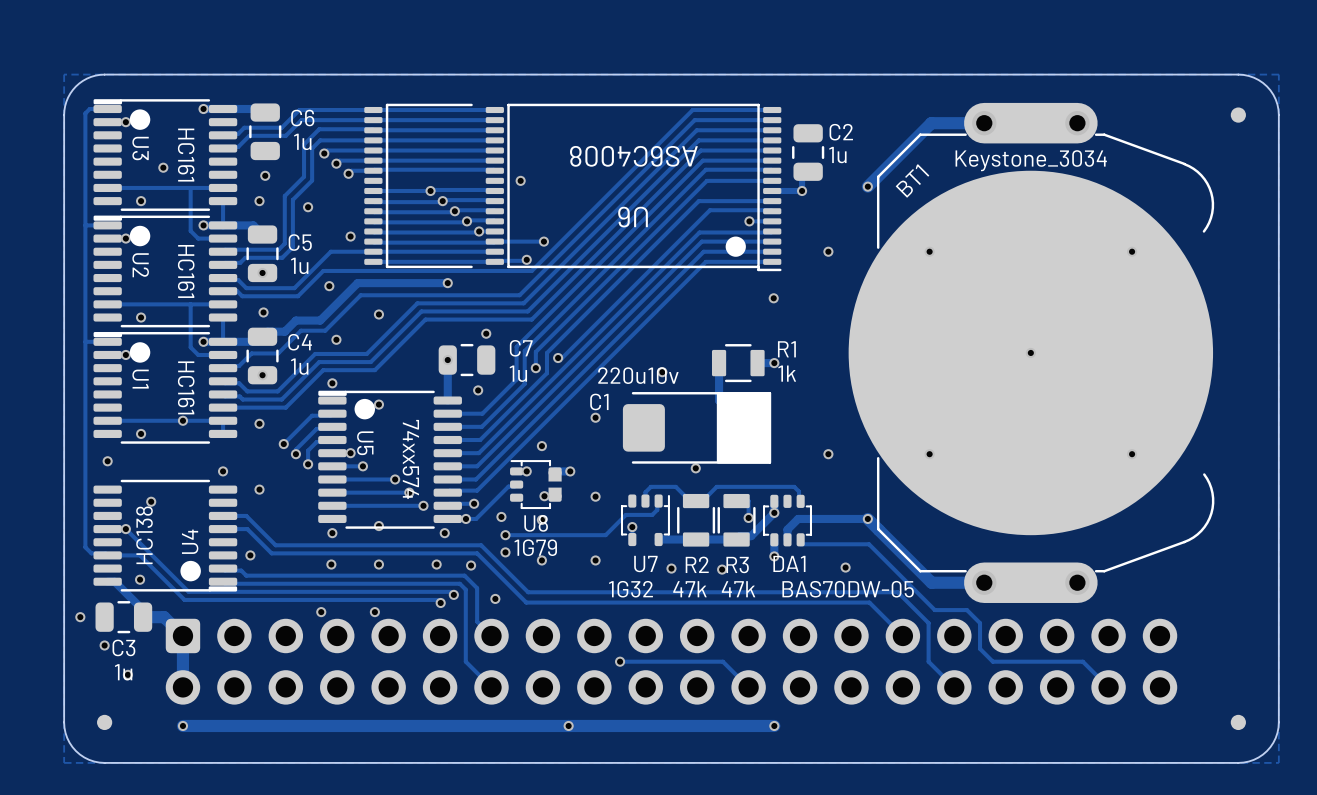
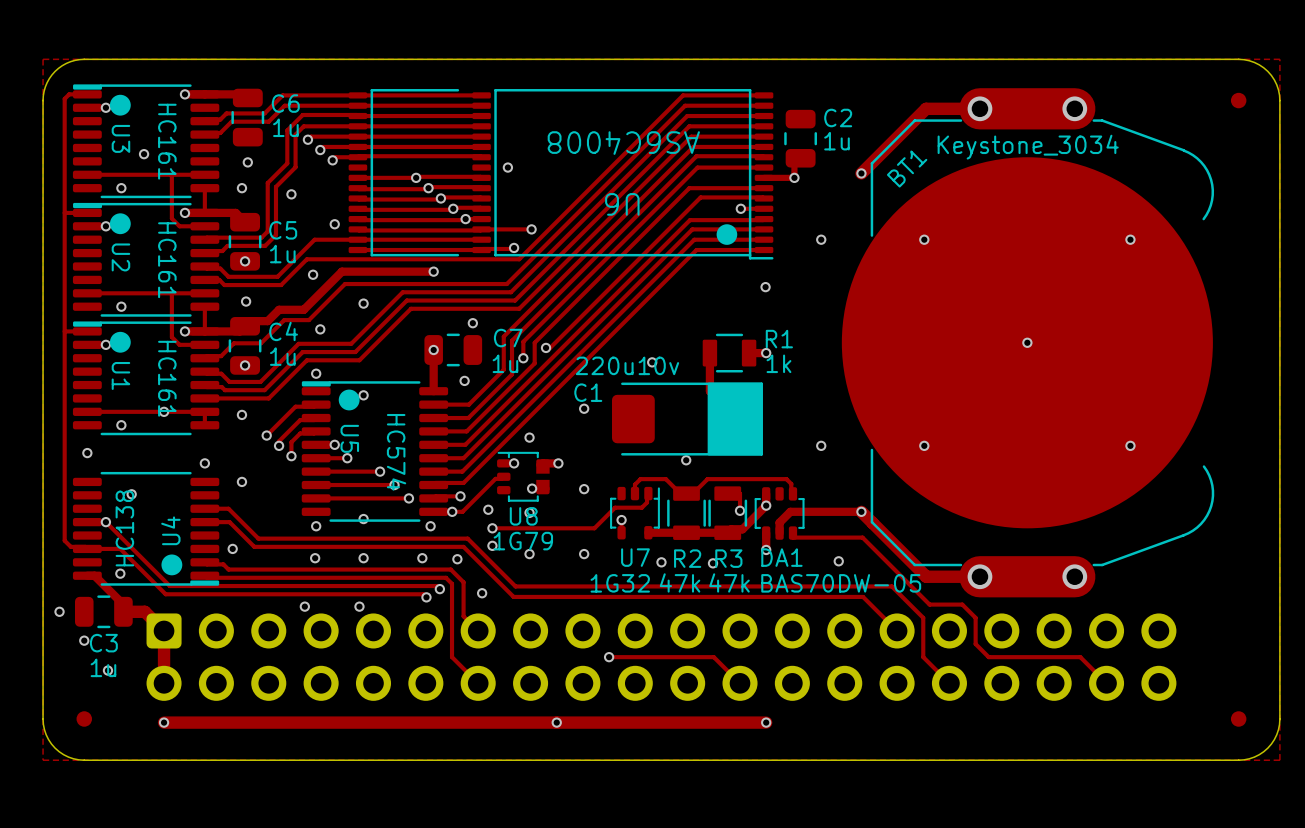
U5 value: 74xx574 (410, 459) -> HC574 (396, 452)

